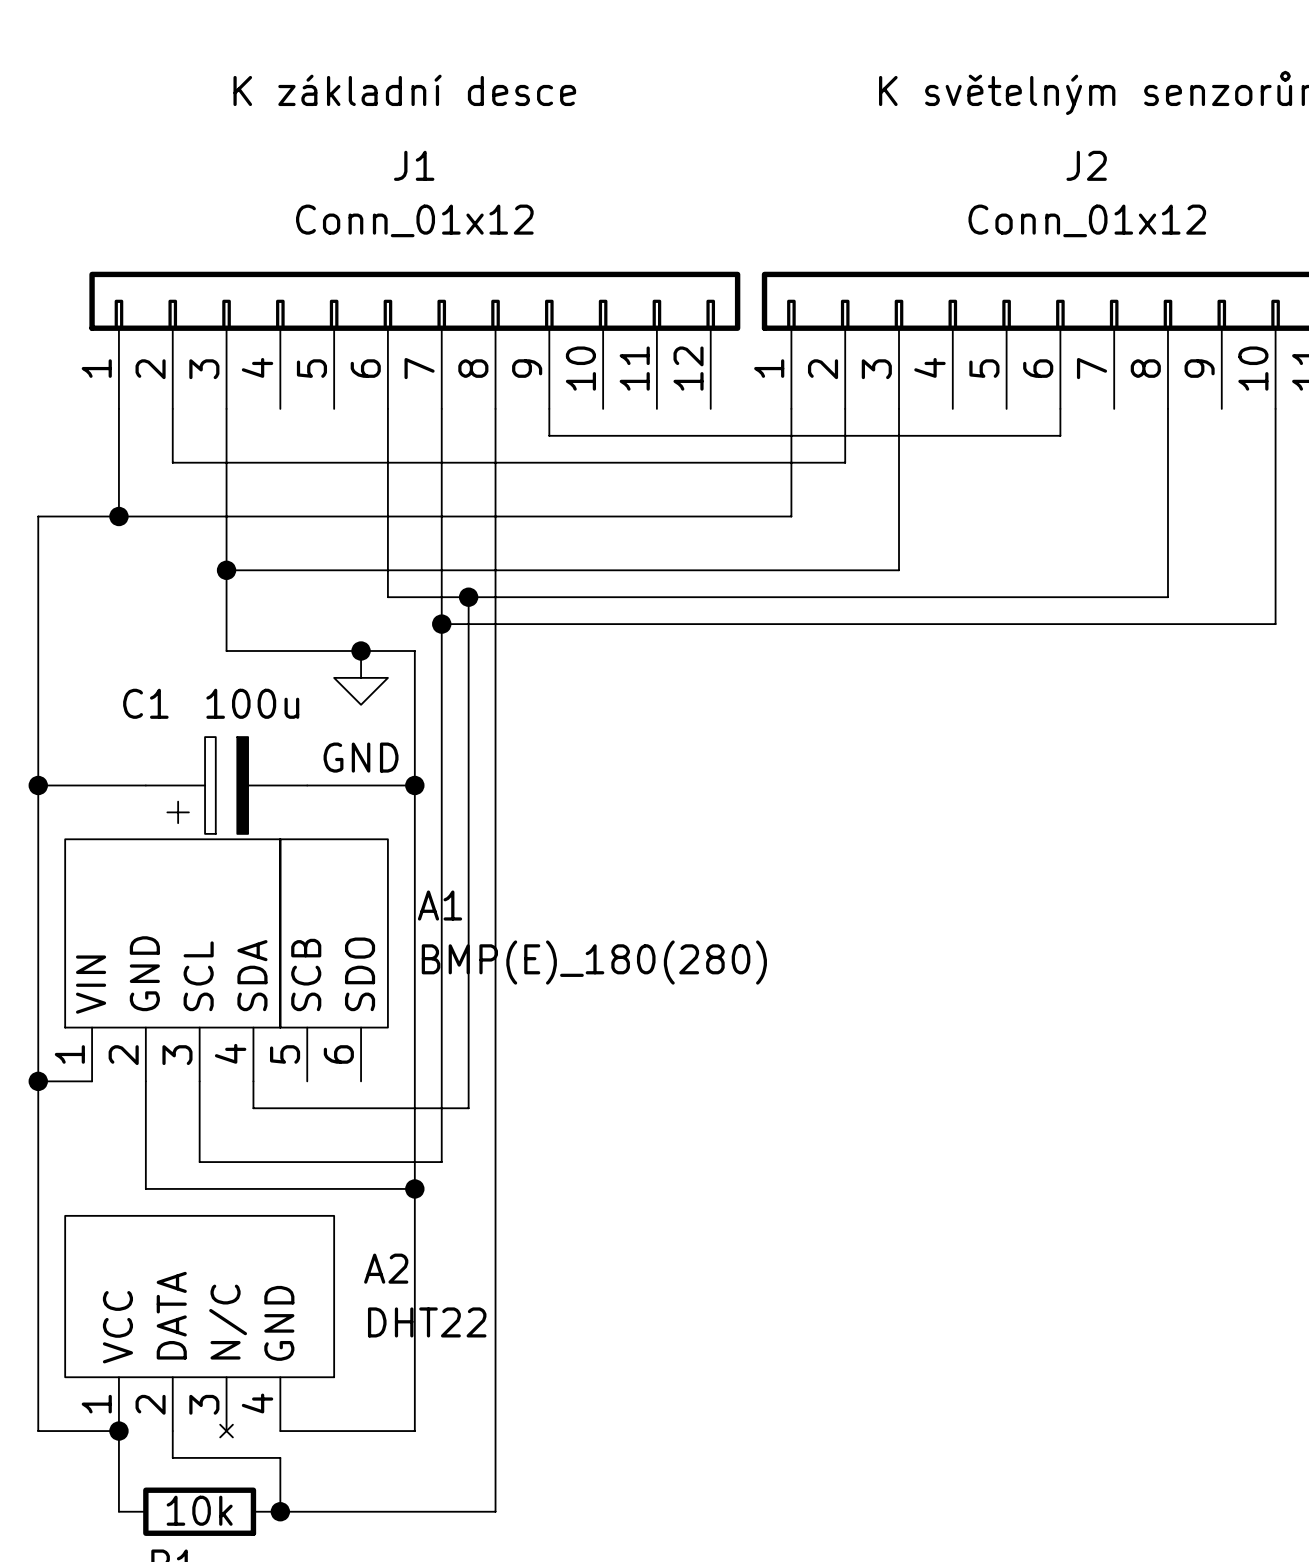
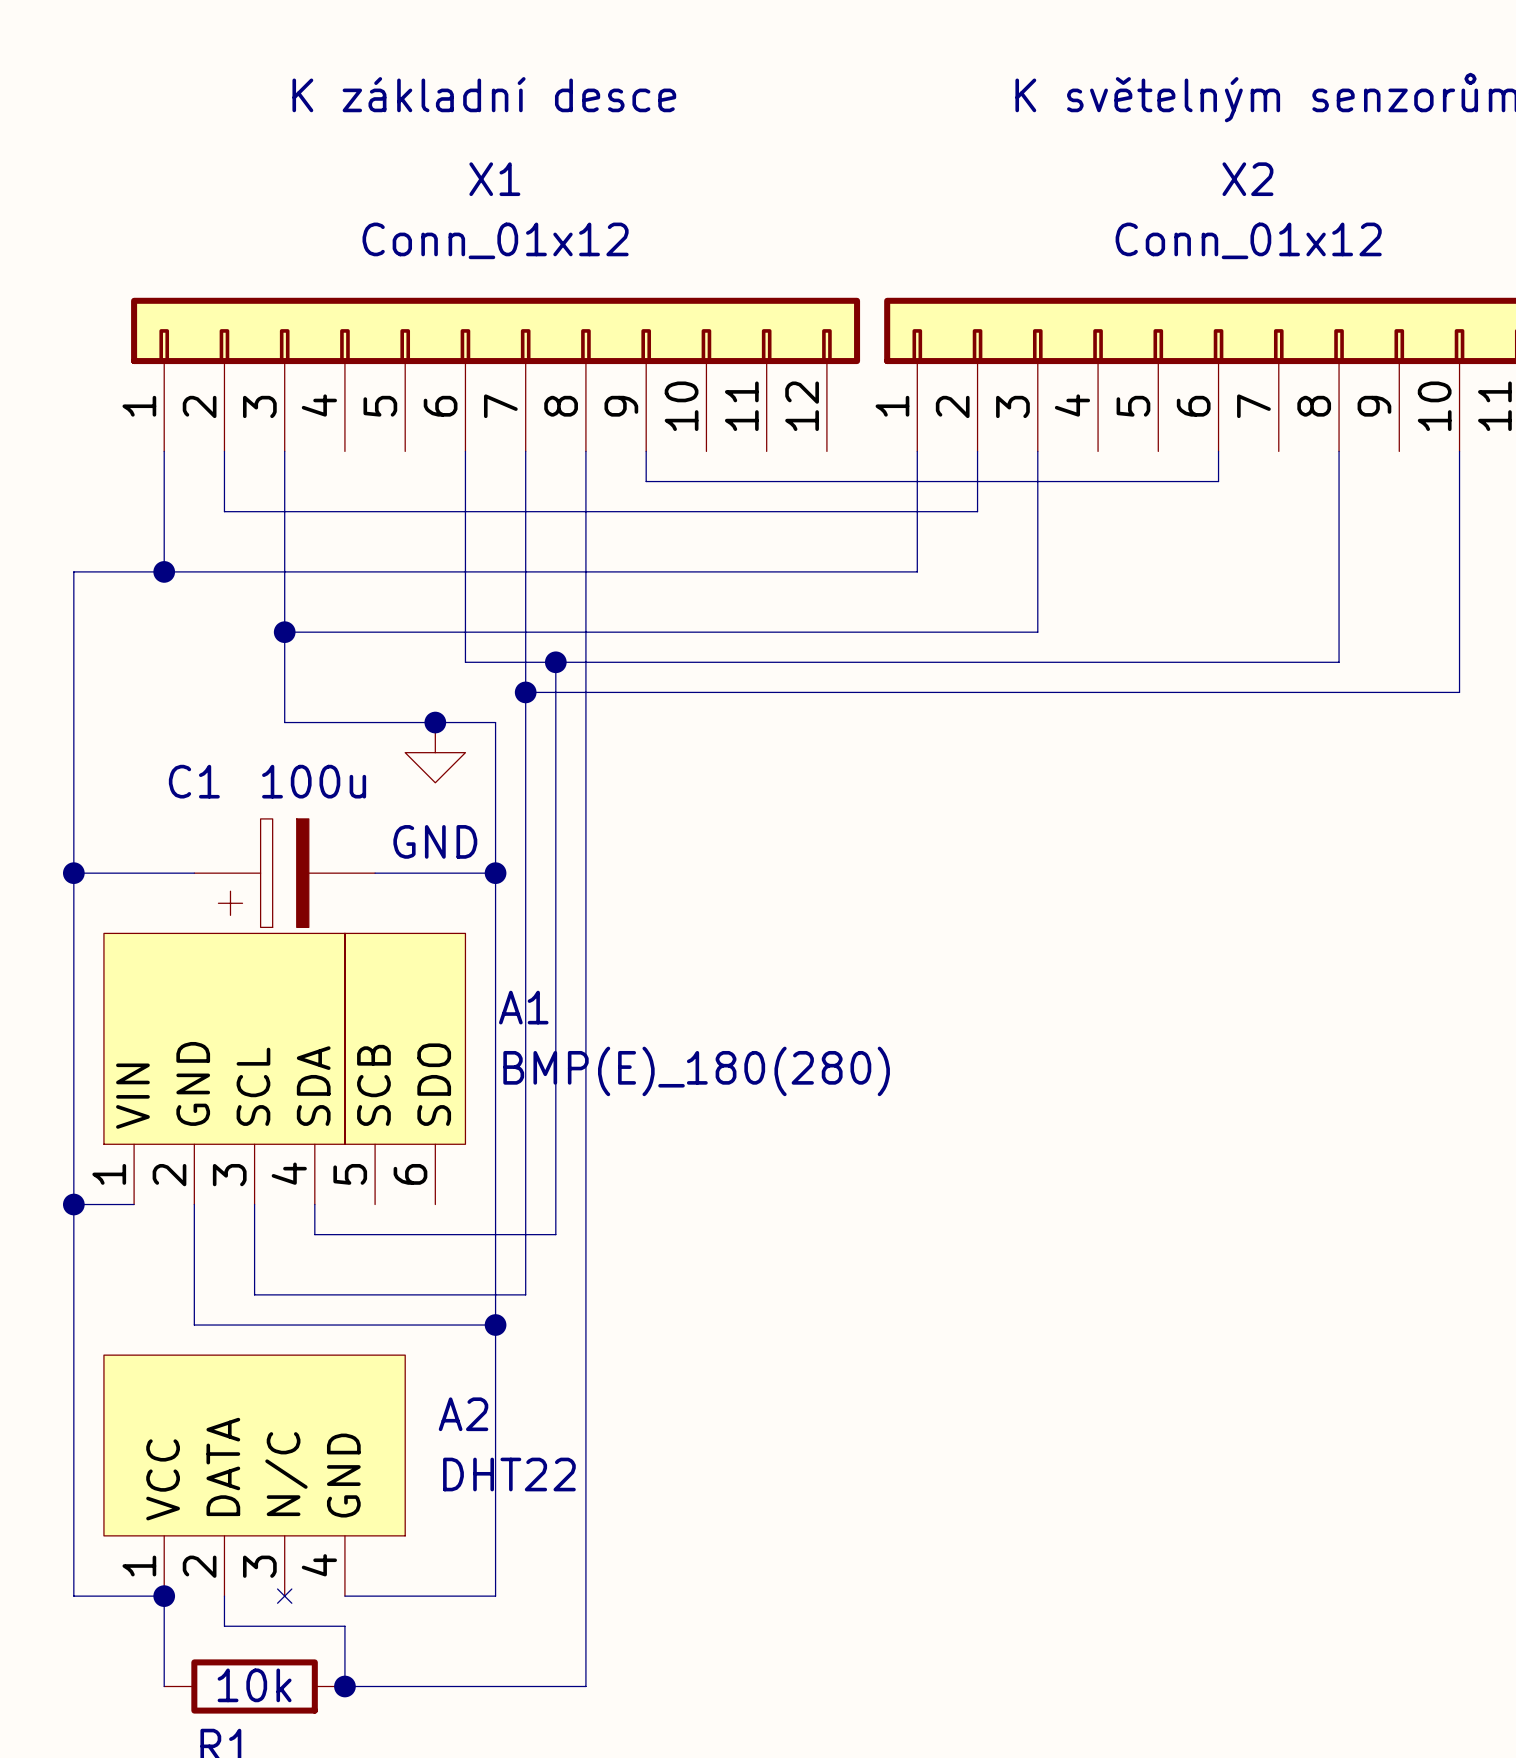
J1 name: J1 (414, 165) -> X1 (494, 179)
J2 name: J2 (1086, 165) -> X2 (1247, 179)

